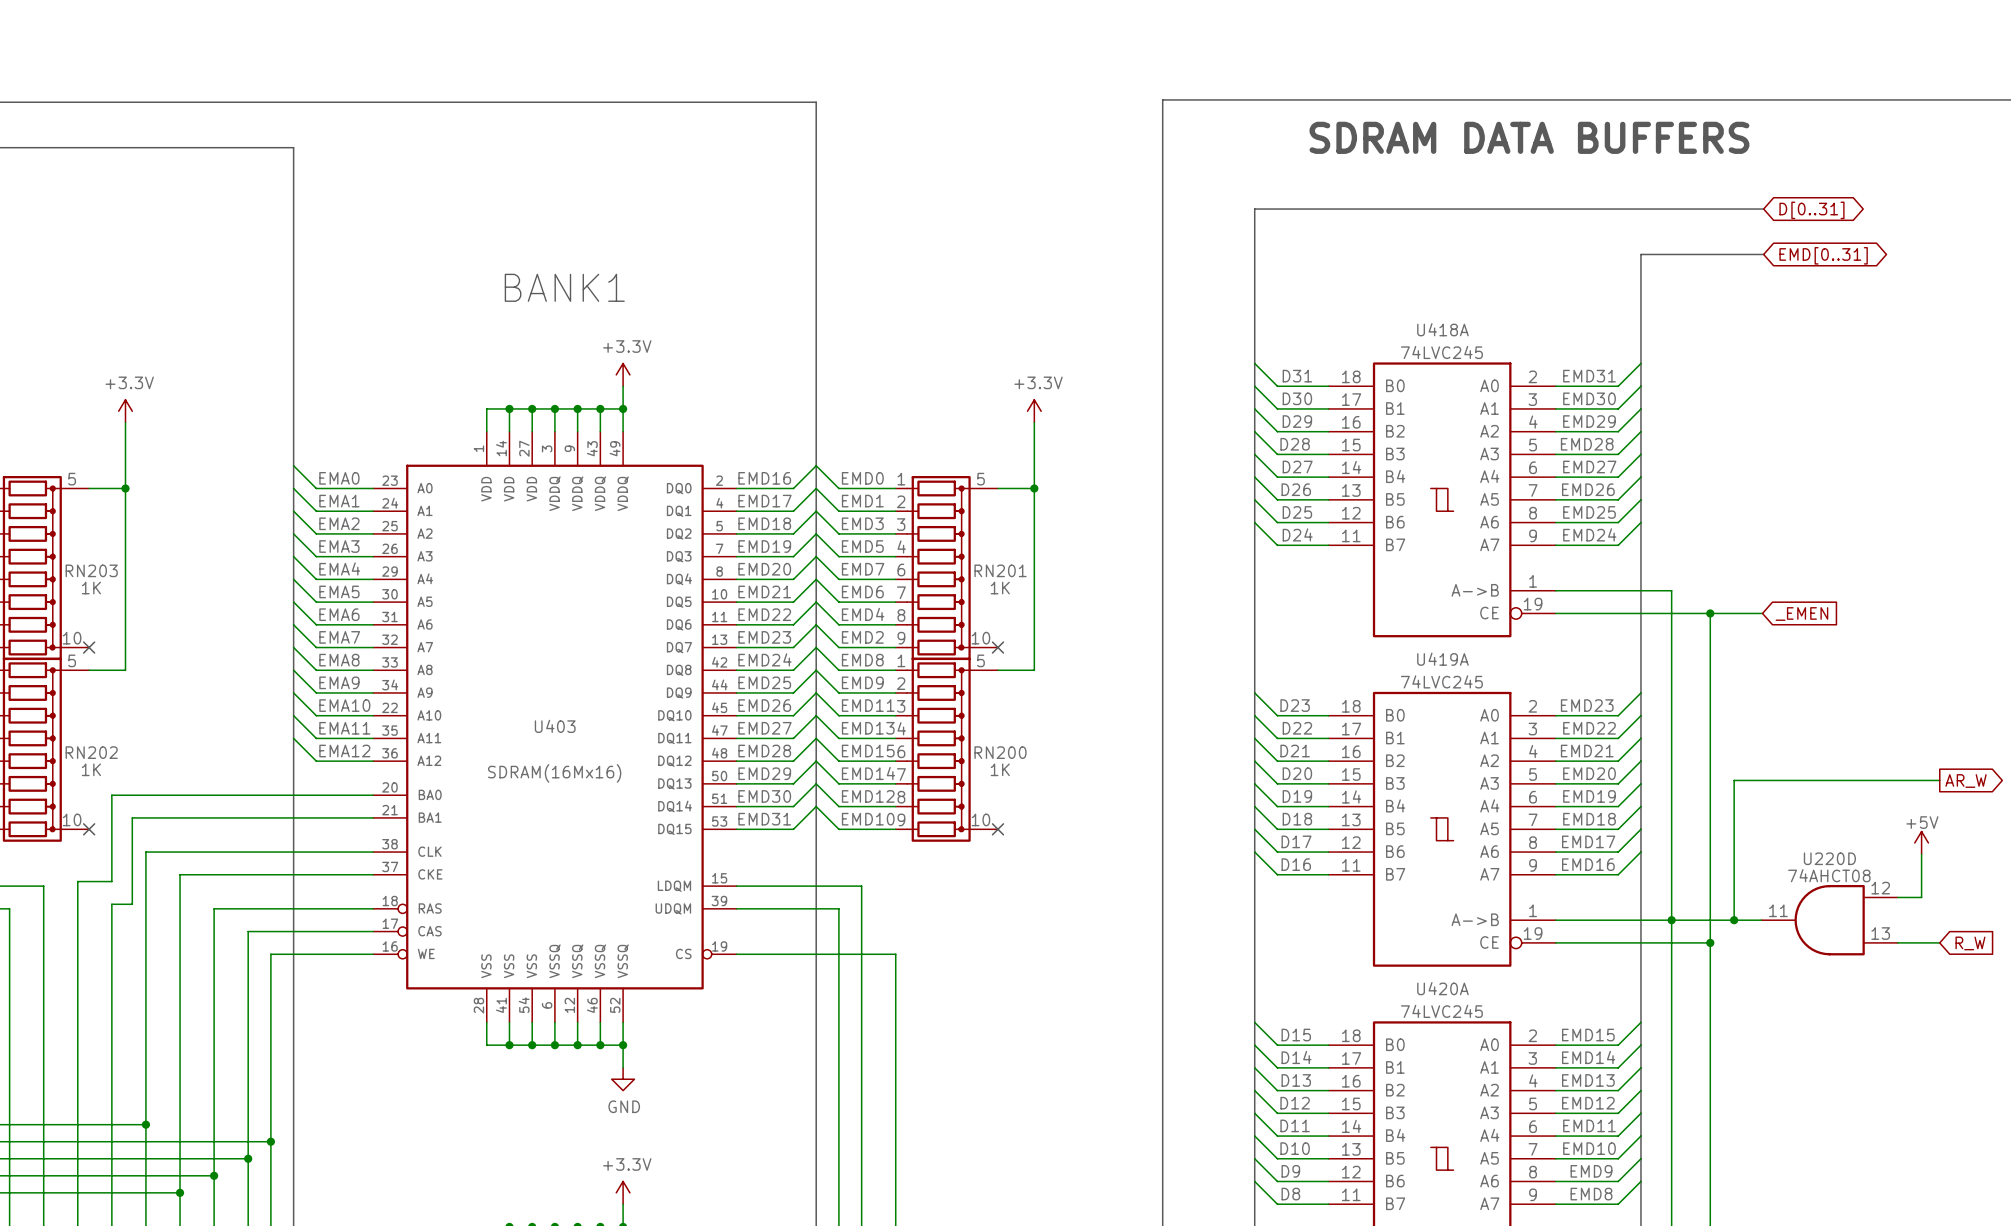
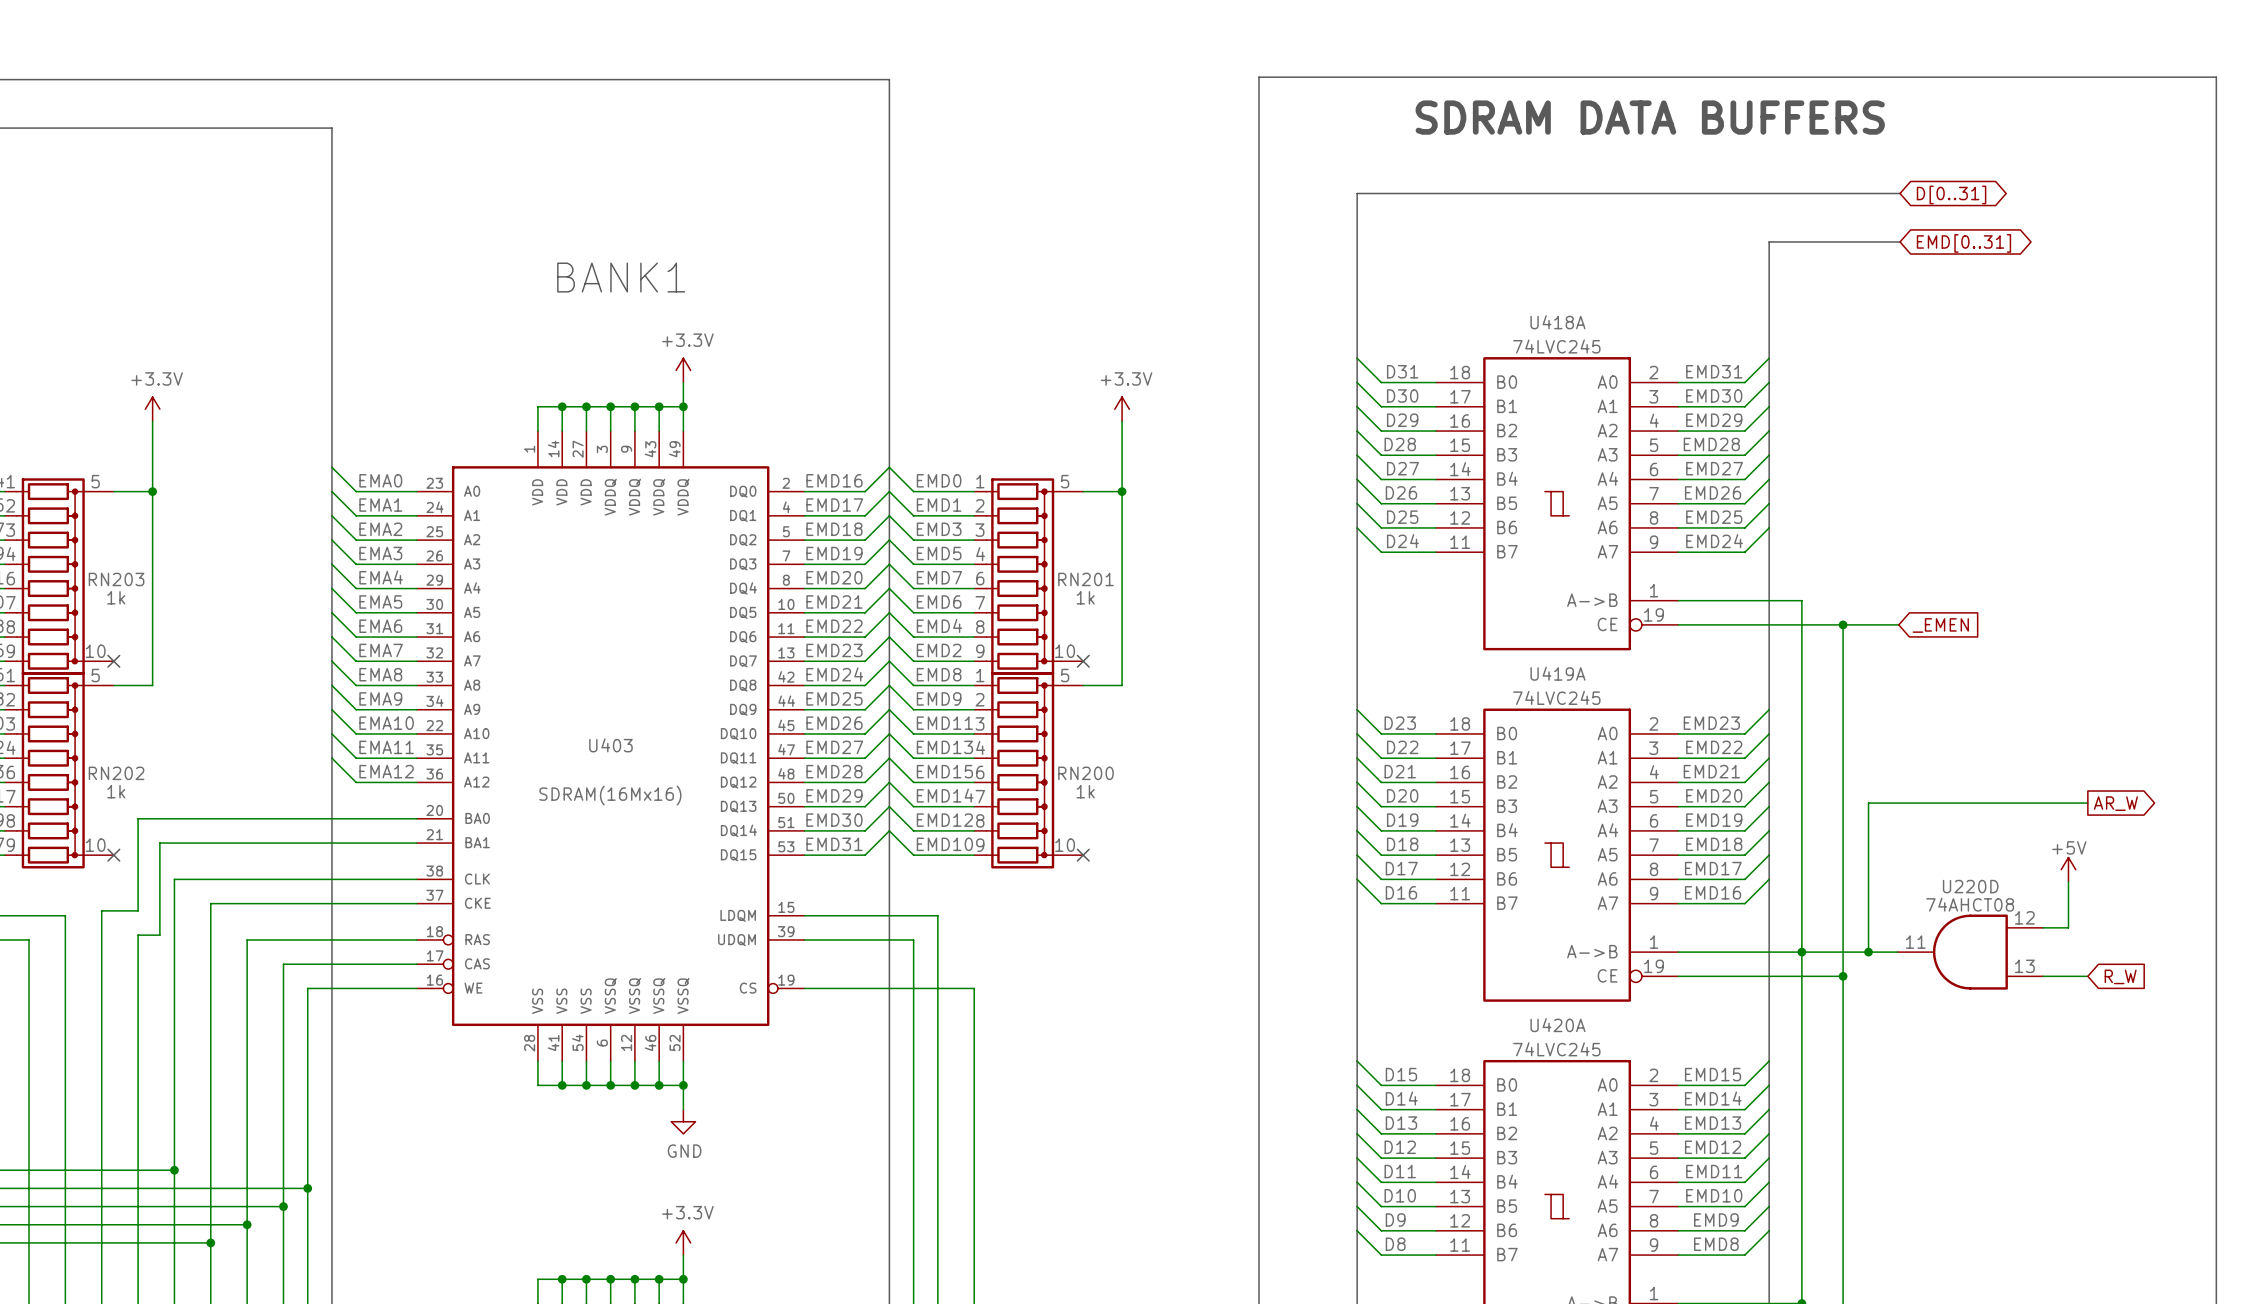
RN203 value: 1K (91, 588) -> 1k (116, 597)
RN201 value: 1K (1000, 588) -> 1k (1085, 597)
RN202 value: 1K (91, 769) -> 1k (116, 791)
RN200 value: 1K (1000, 769) -> 1k (1085, 791)

